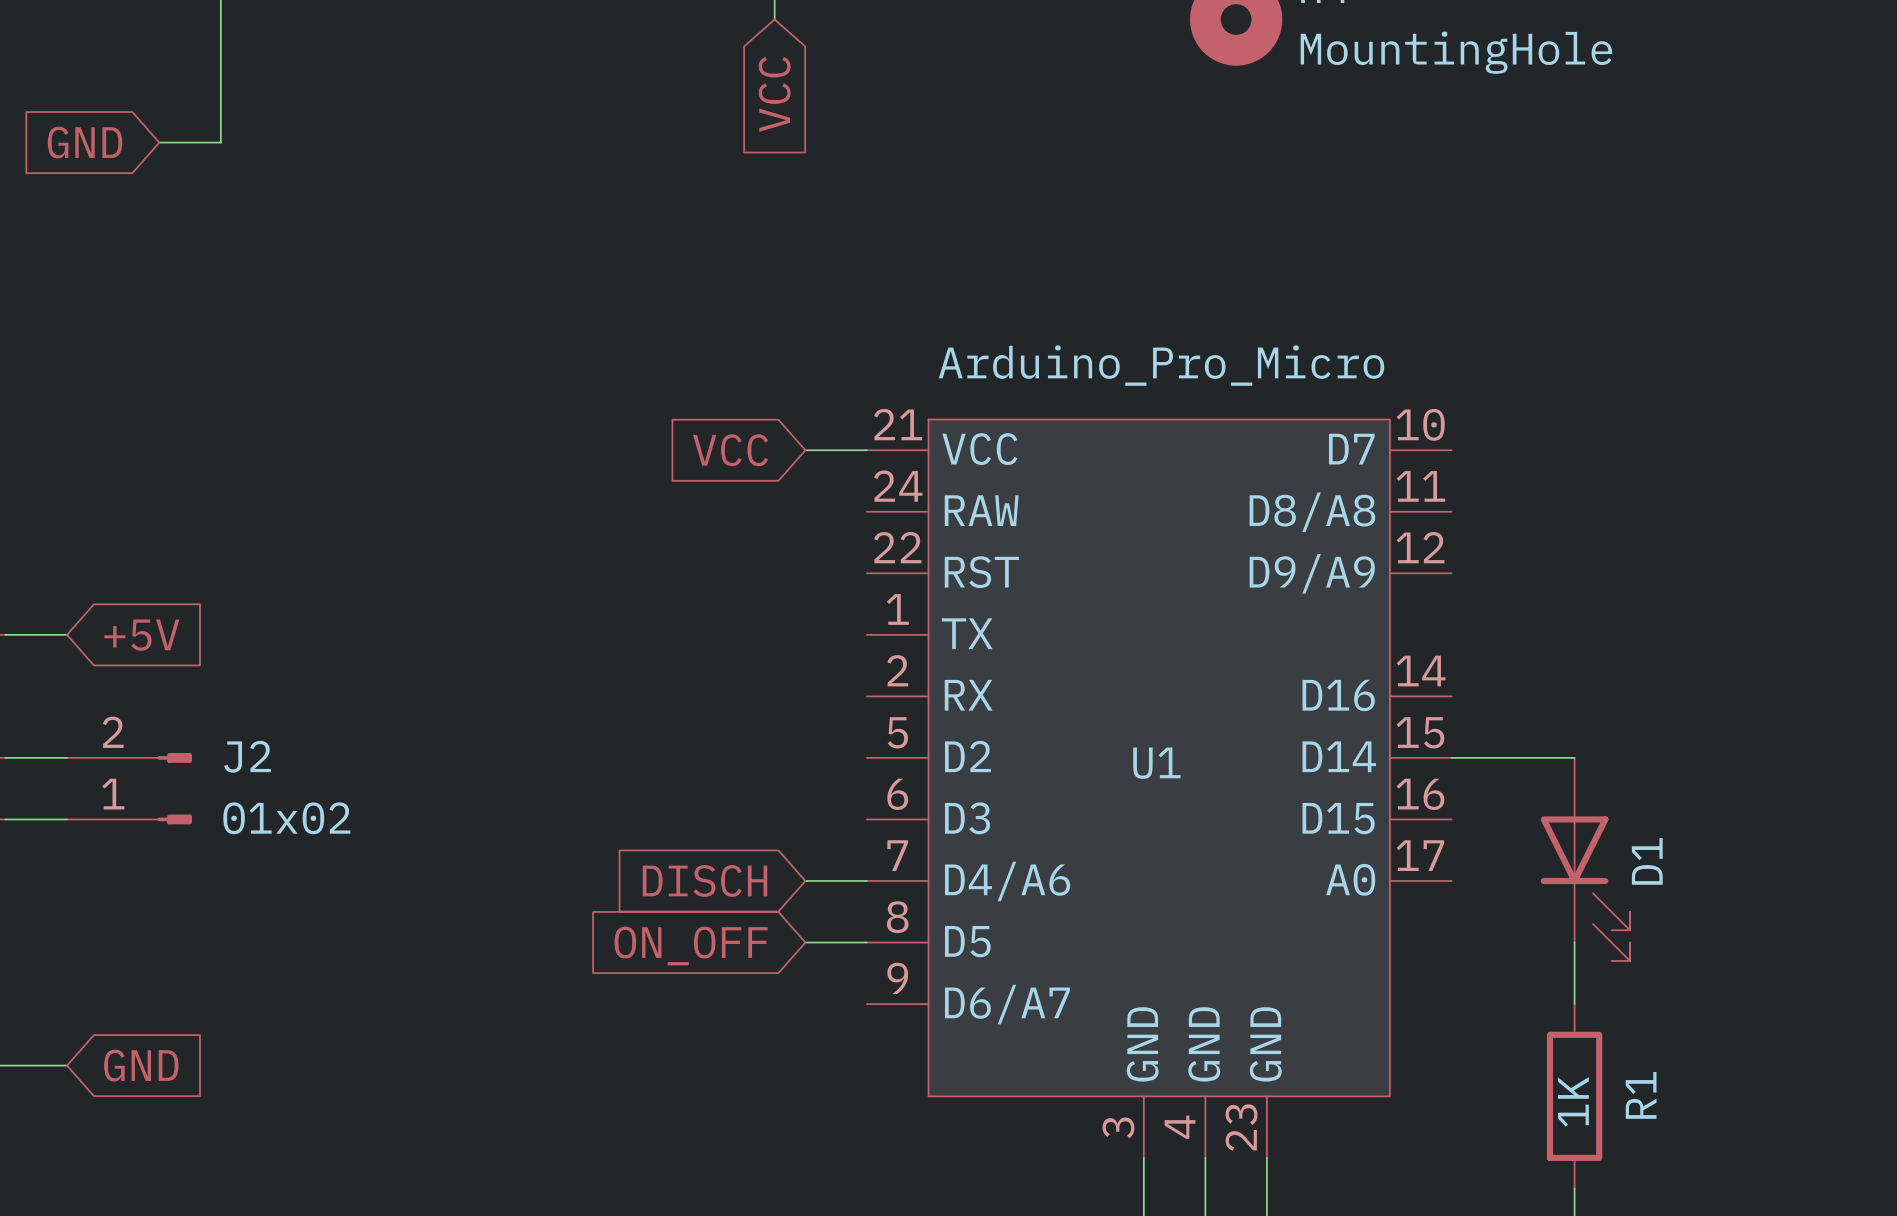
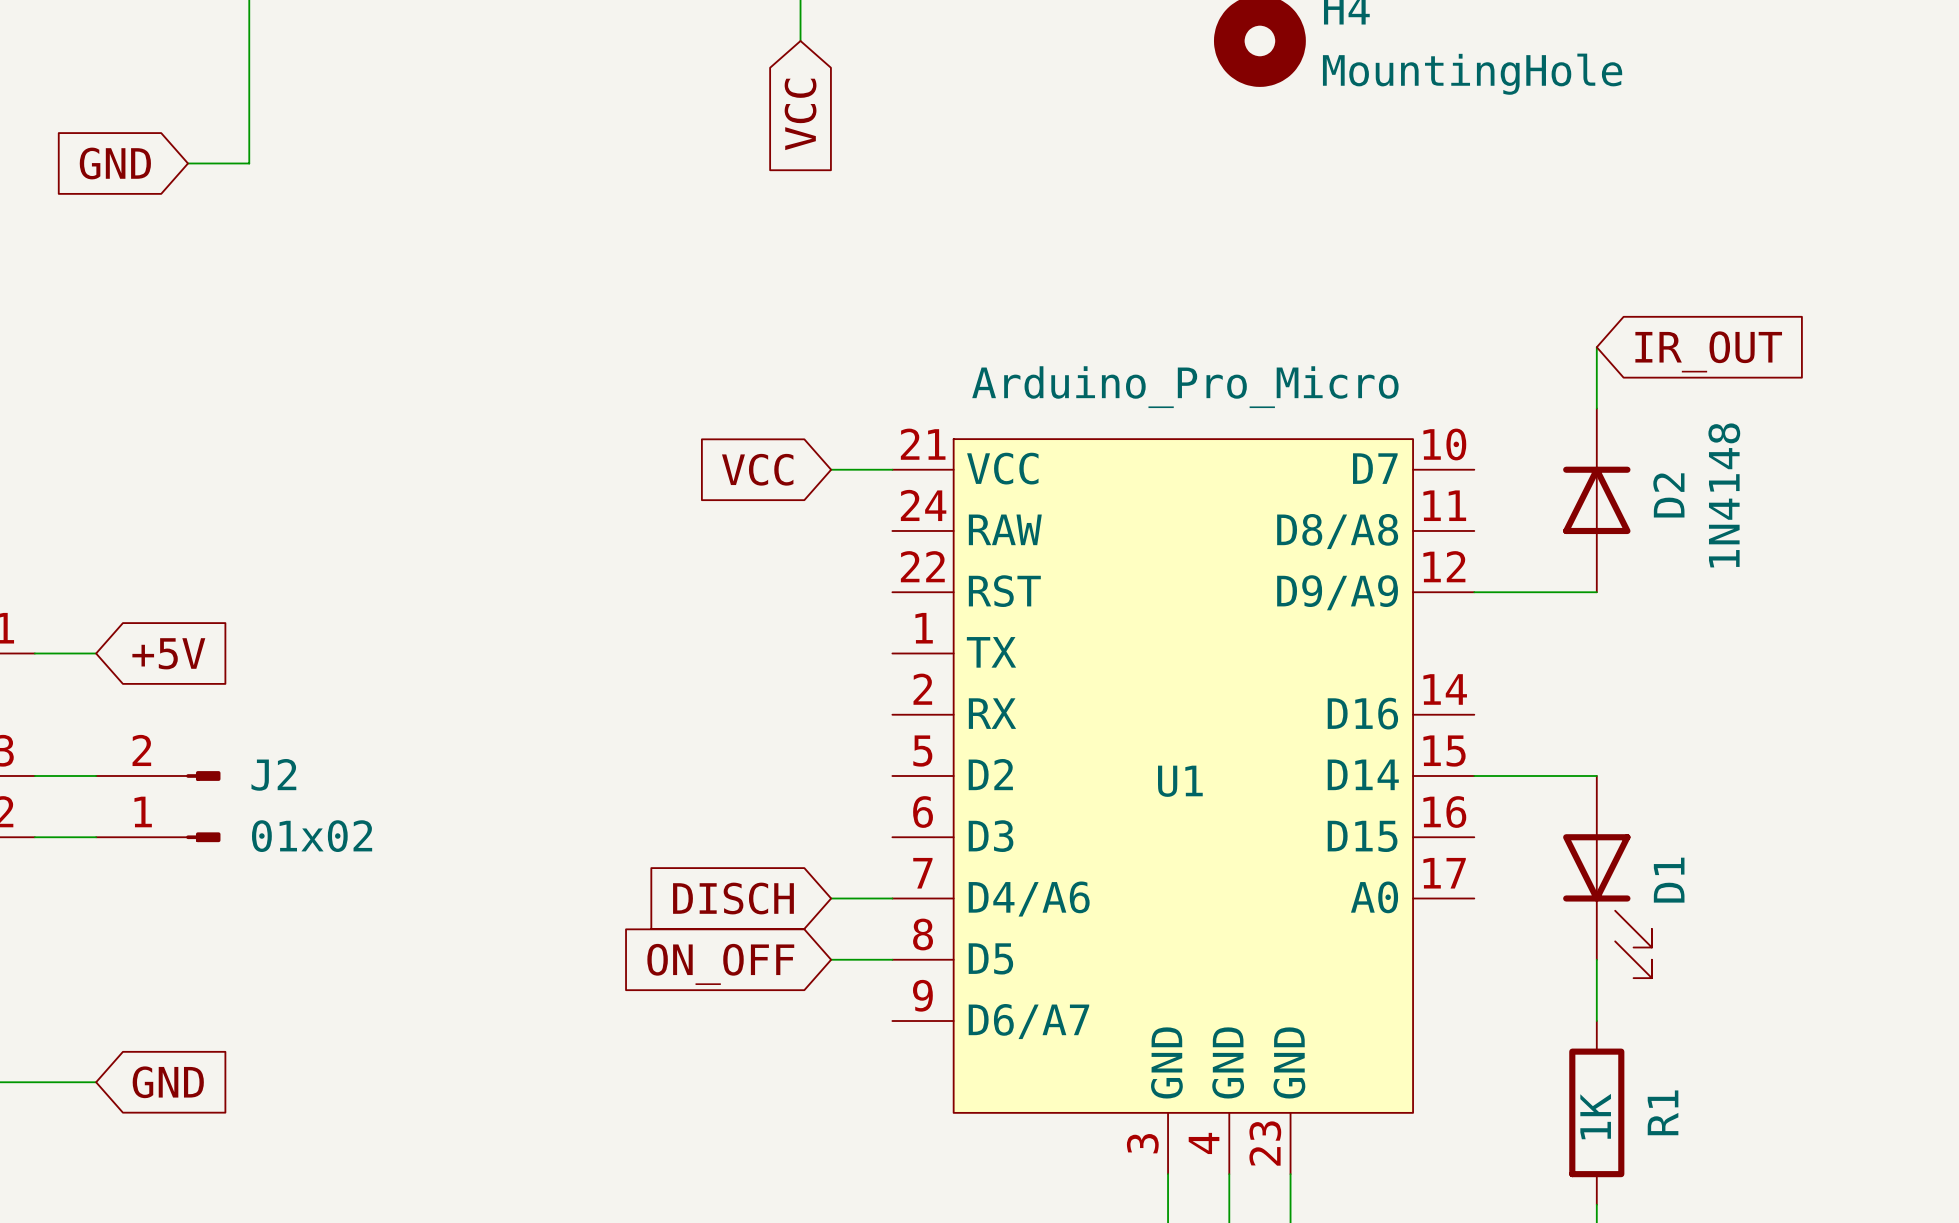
wire: none -> (1596, 347) (1596, 408)
global label: none -> IR_OUT (1708, 351)
D2: none -> 1N4148 (1596, 500)
wire: none -> (1474, 592) (1596, 592)

